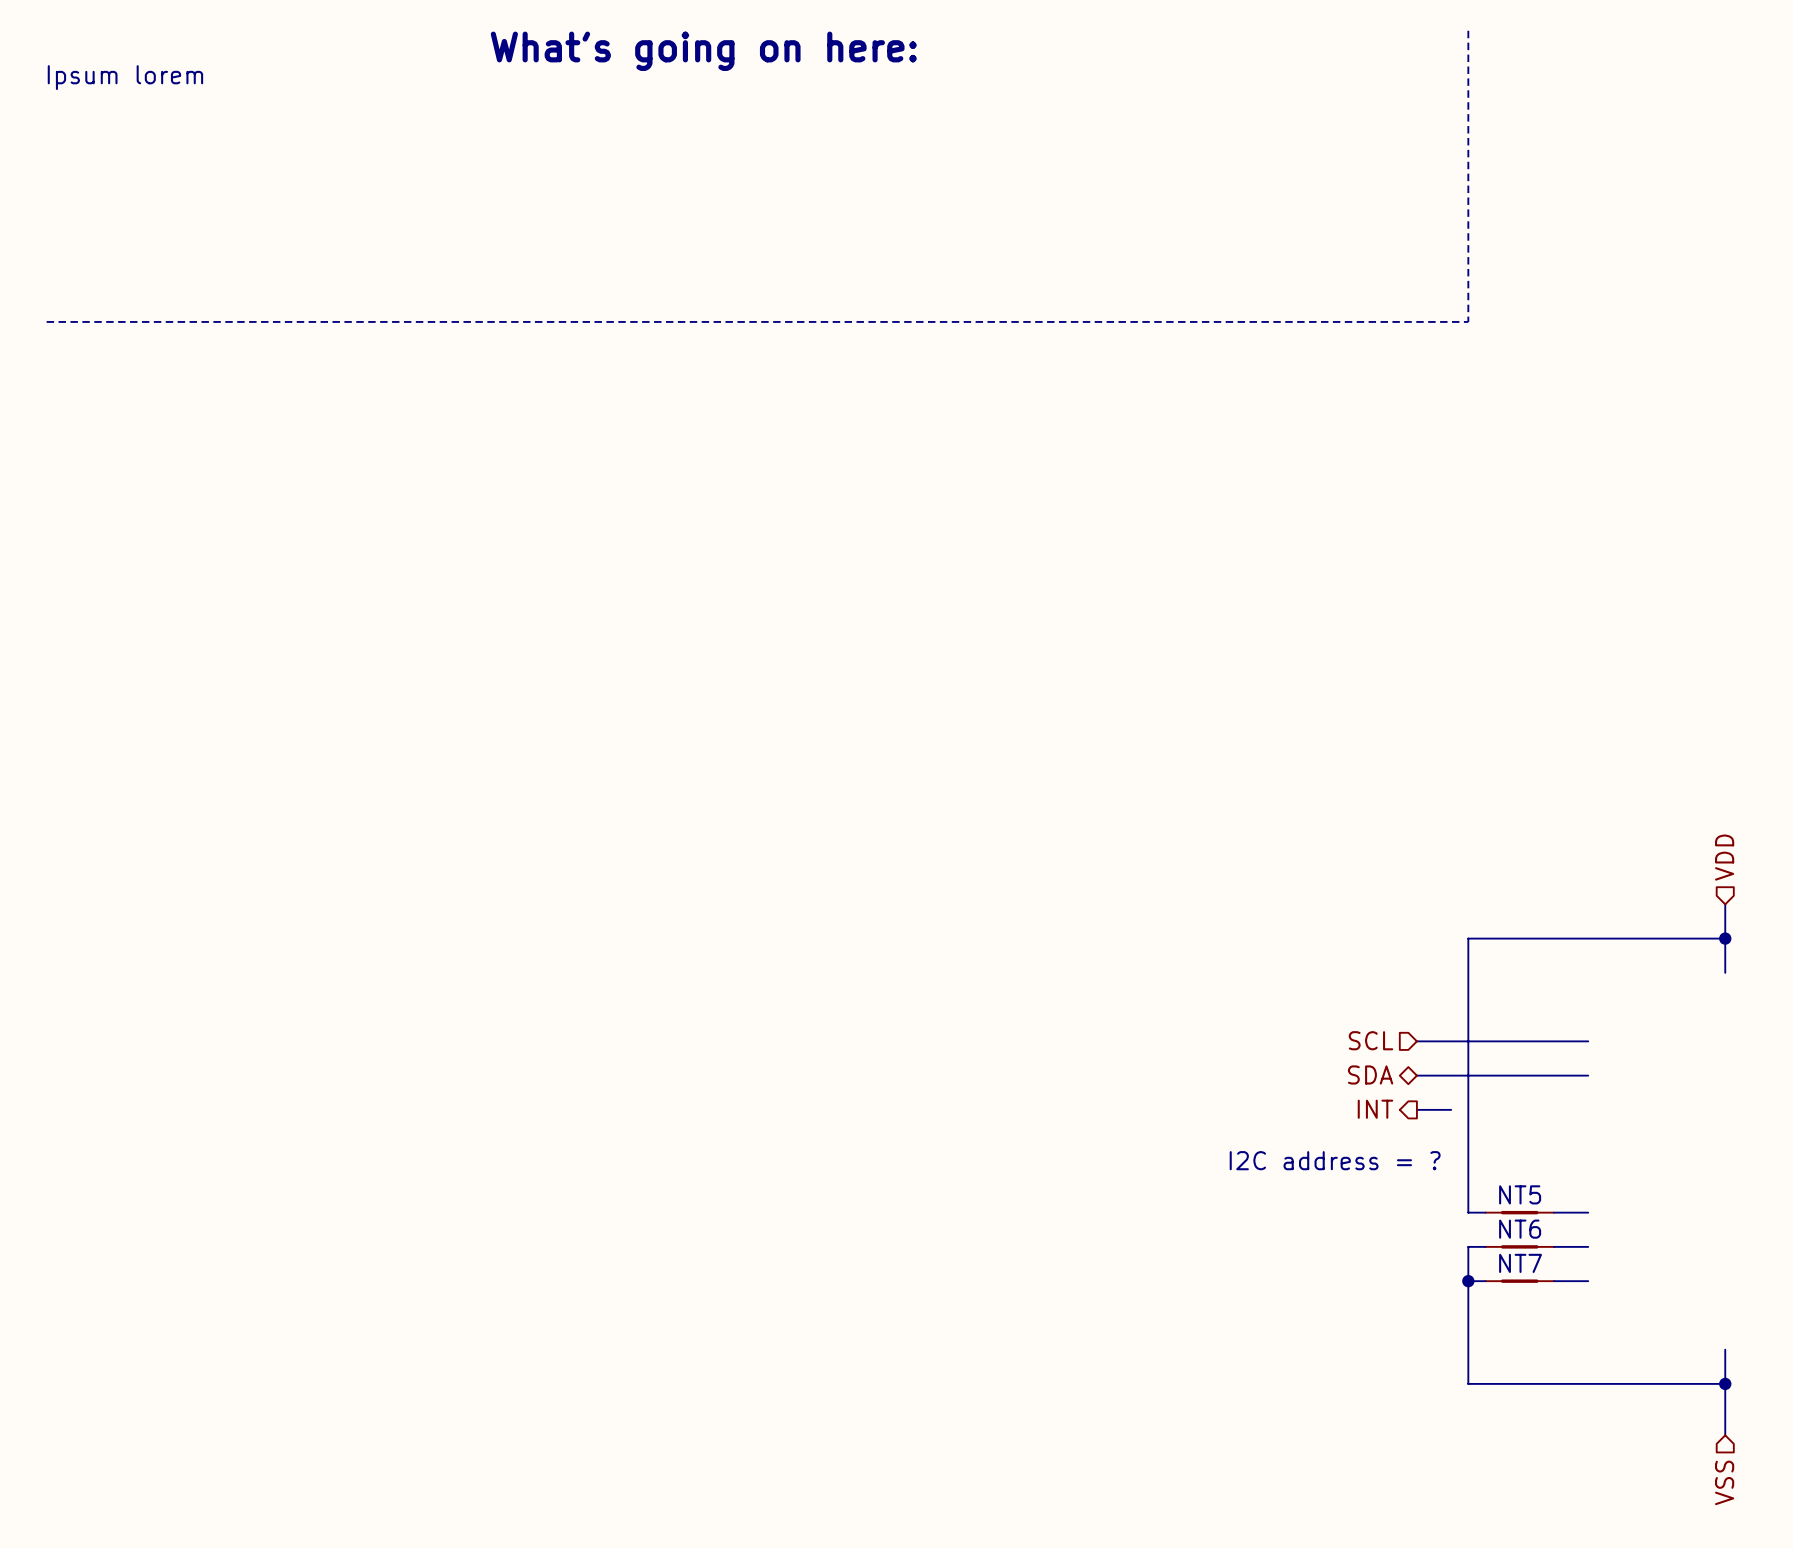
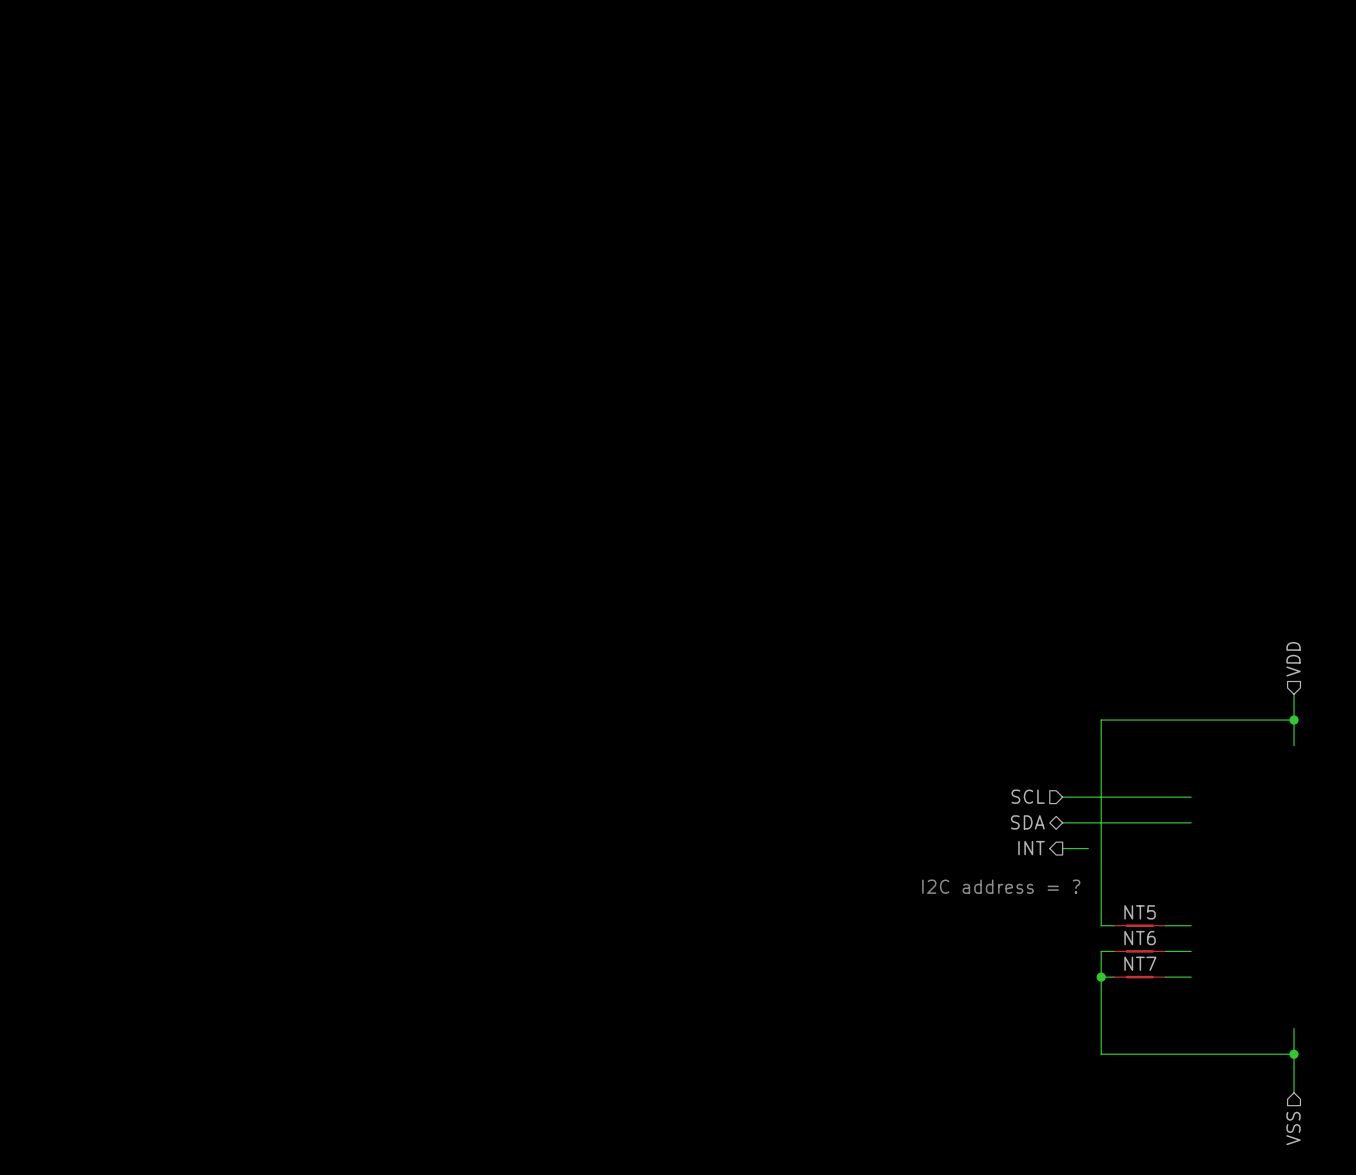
line: (1468, 30) (1468, 321) (46, 321) -> none
text: What's going on here: (703, 51) -> none
text: Ipsum lorem (125, 77) -> none

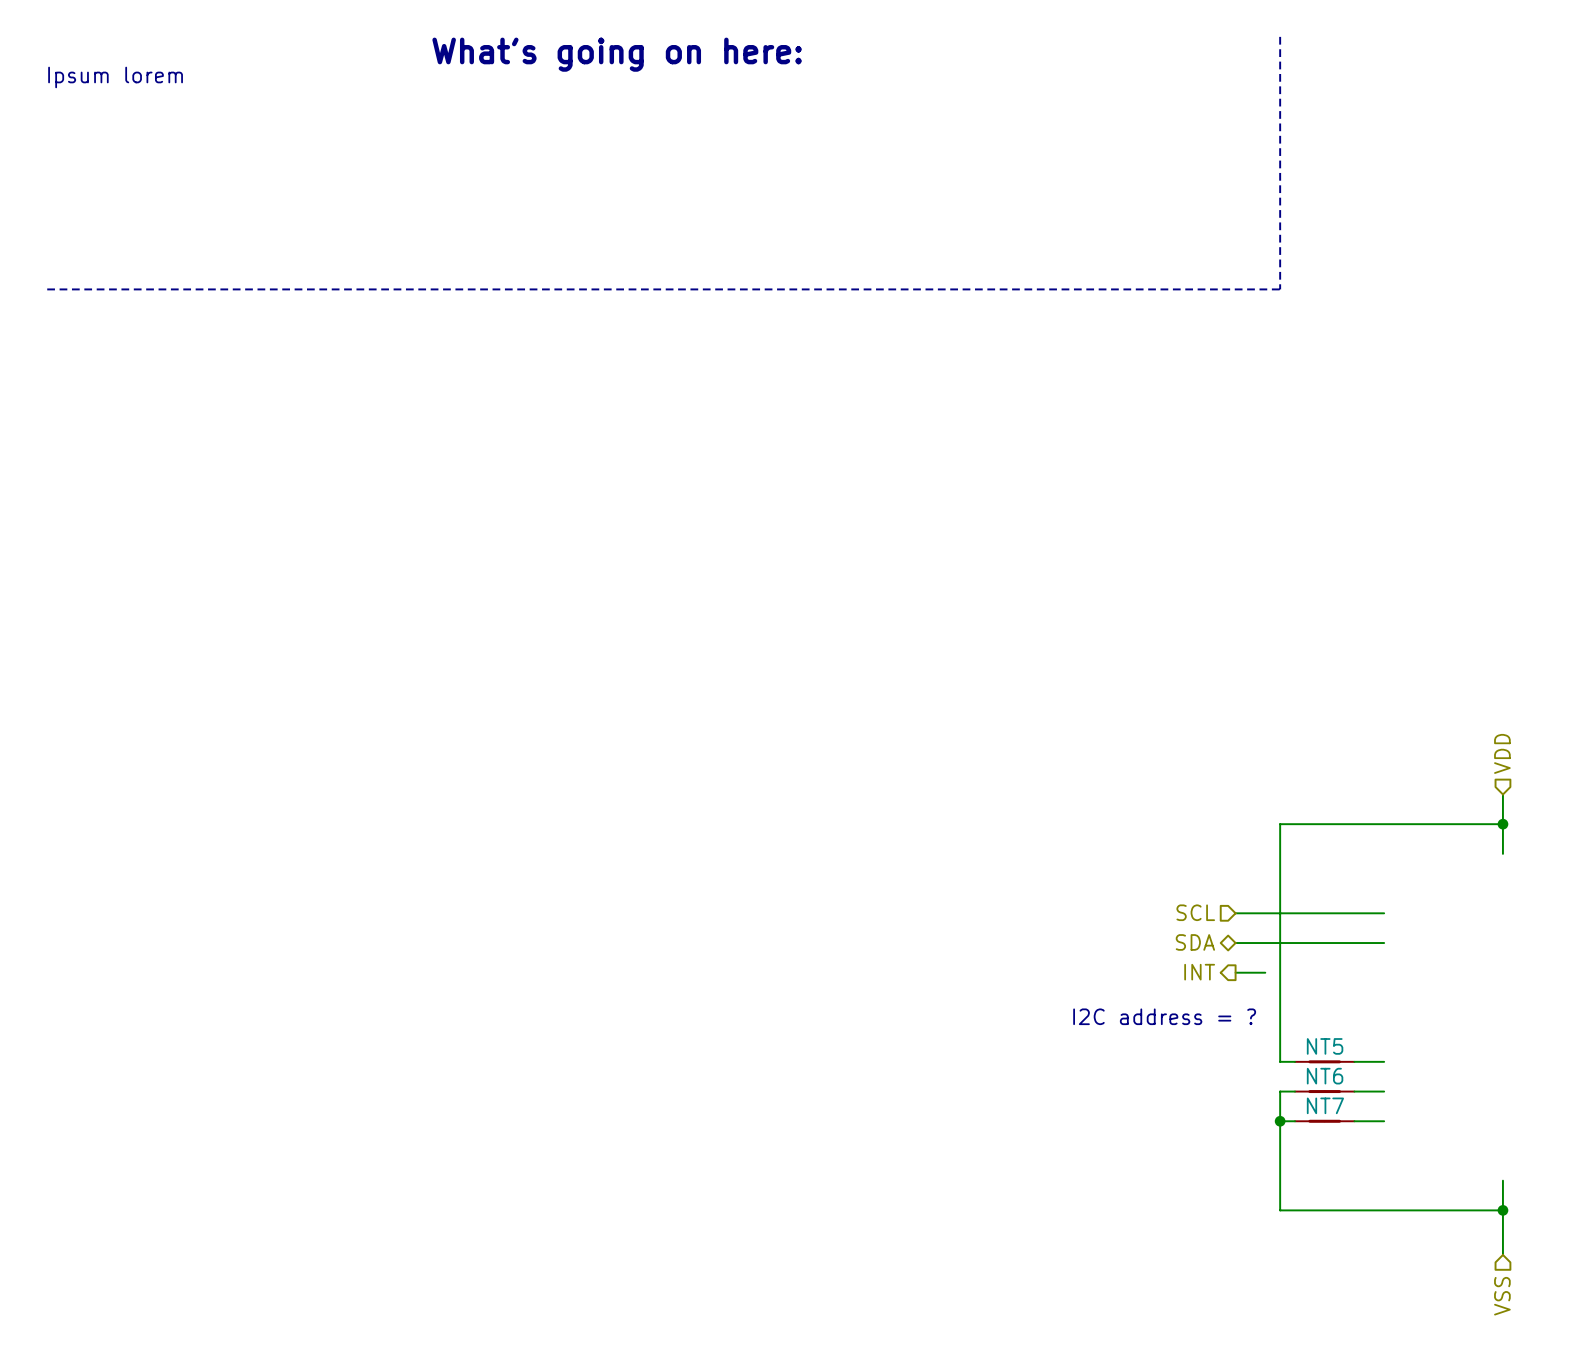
line: none -> (1280, 36) (1280, 289) (47, 289)
text: none -> What's going on here: (617, 54)
text: none -> Ipsum lorem (115, 77)

